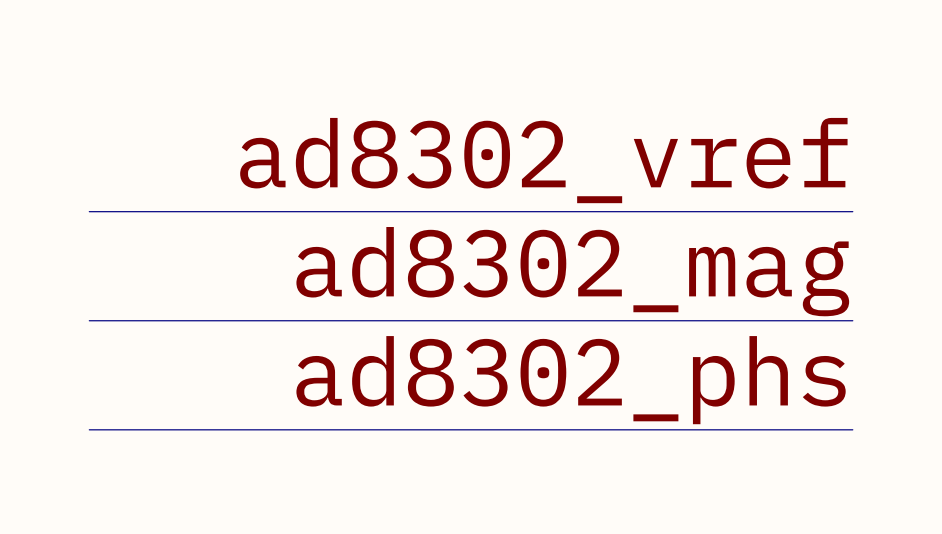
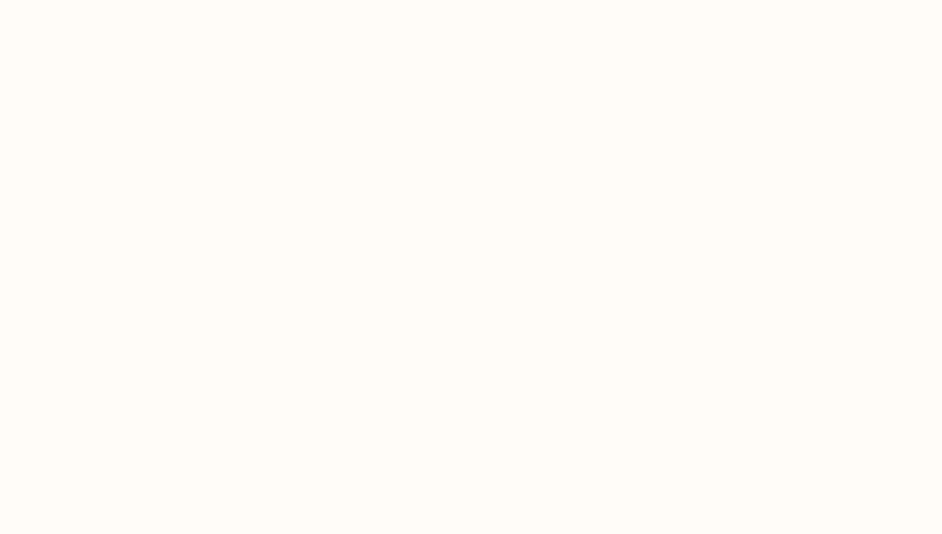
label: ad8302_vref (543, 160) -> none
wire: (89, 211) (852, 211) -> none
label: ad8302_mag (572, 271) -> none
wire: (89, 320) (852, 320) -> none
label: ad8302_phs (571, 380) -> none
wire: (89, 429) (852, 429) -> none

